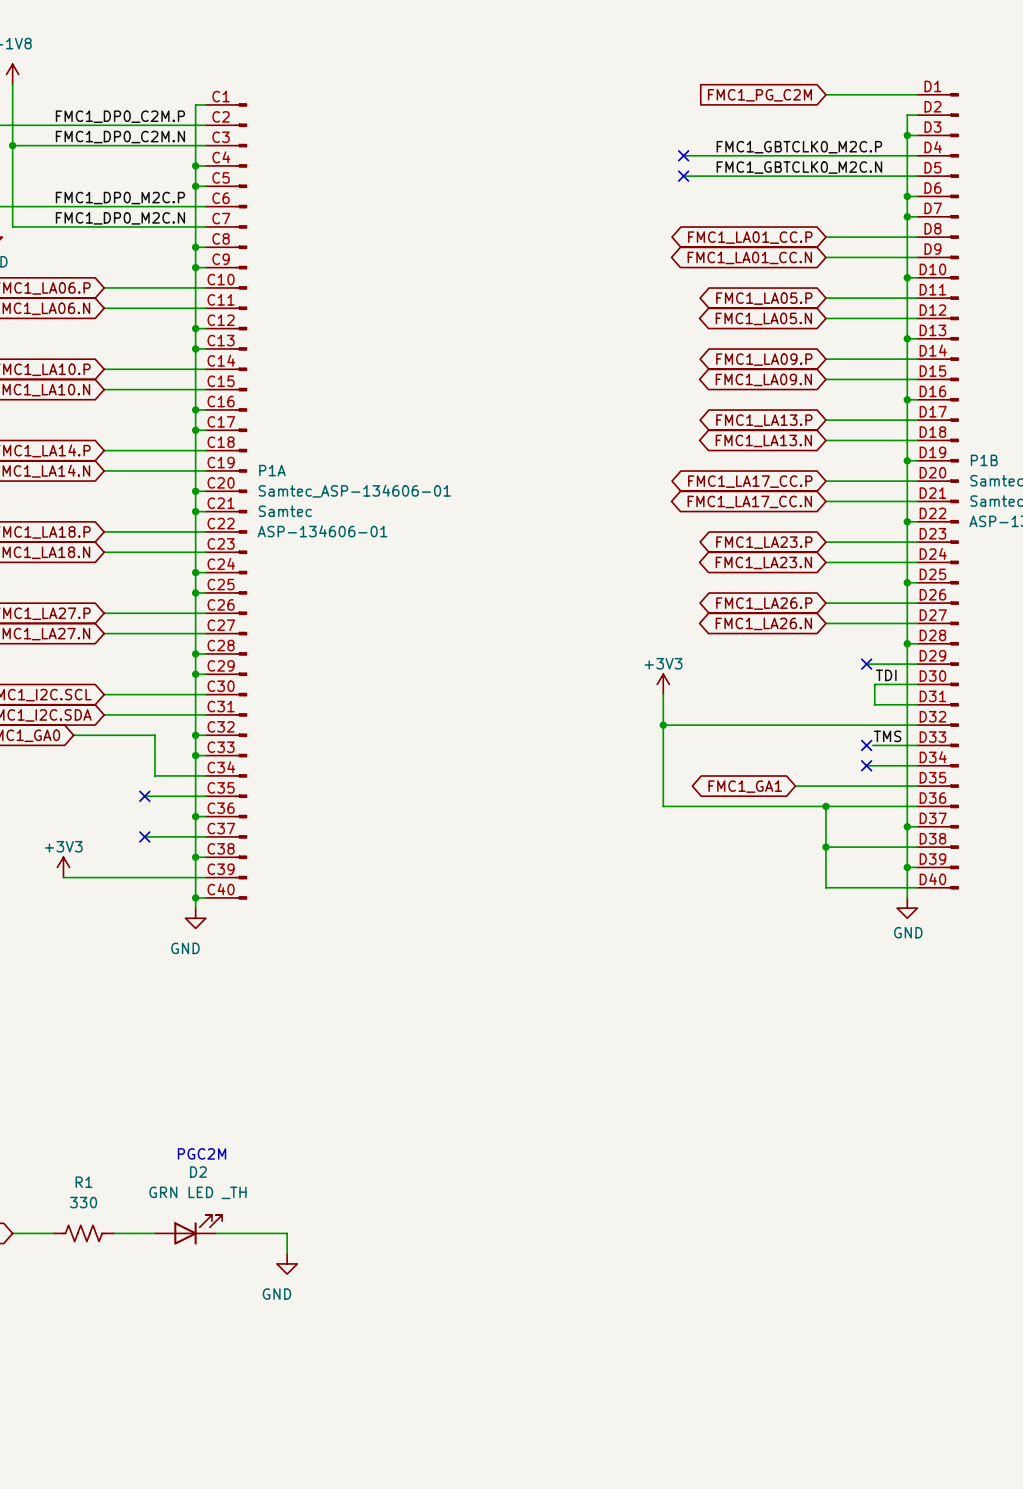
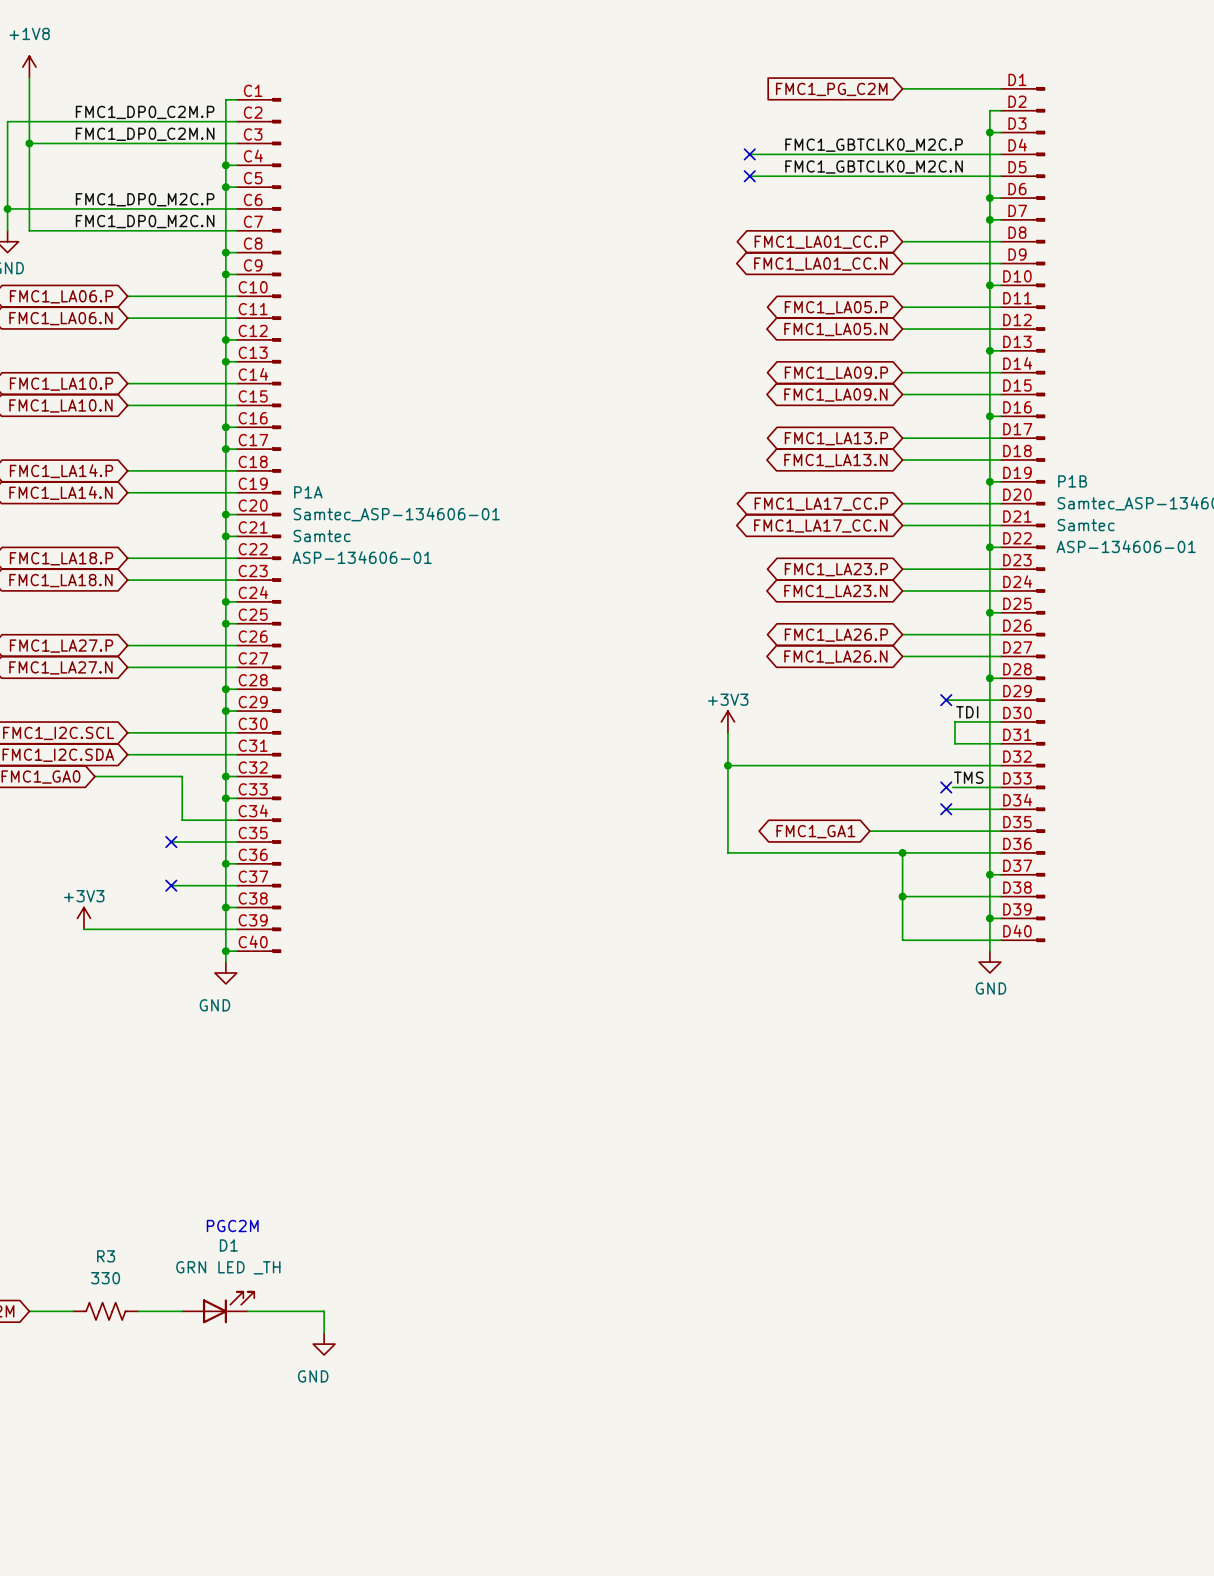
D2 name: D2 (198, 1172) -> D1 (228, 1245)
R1 name: R1 (84, 1182) -> R3 (106, 1256)

